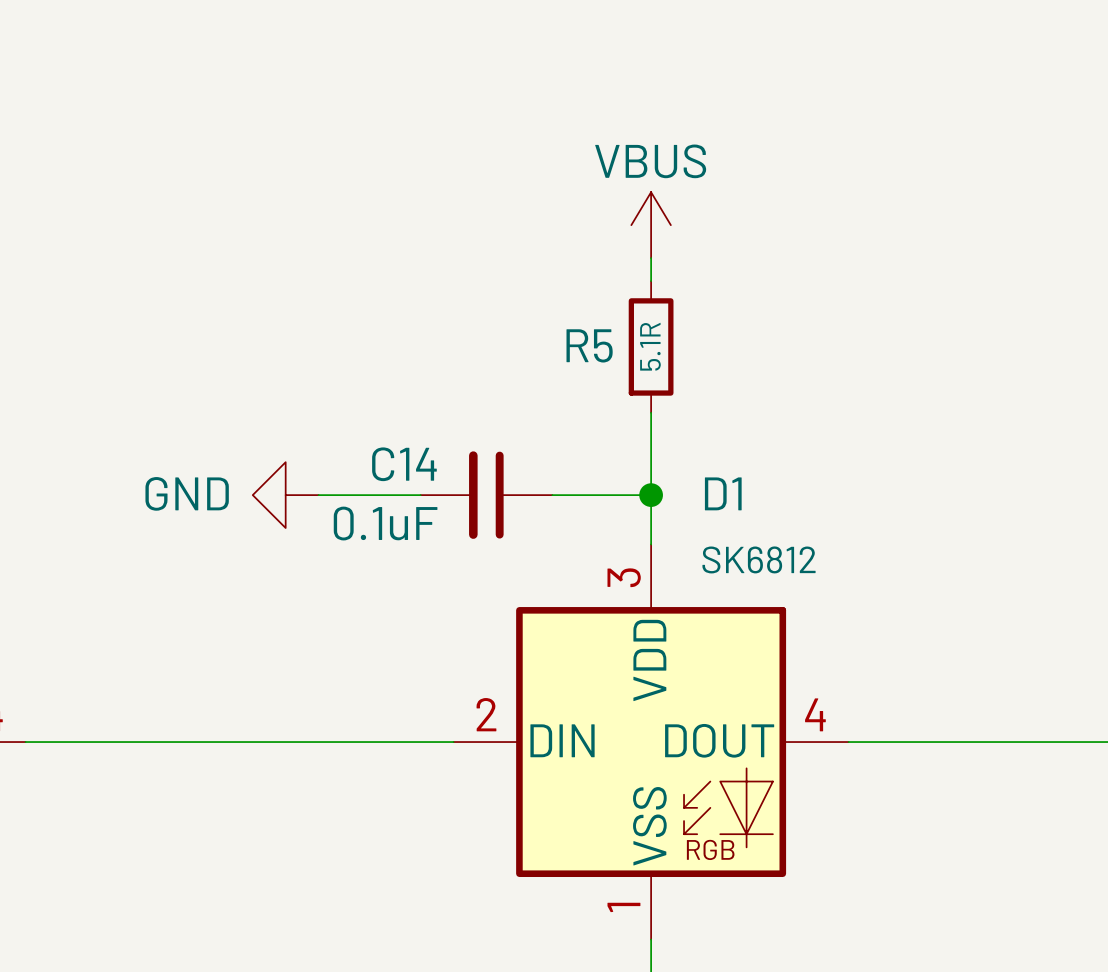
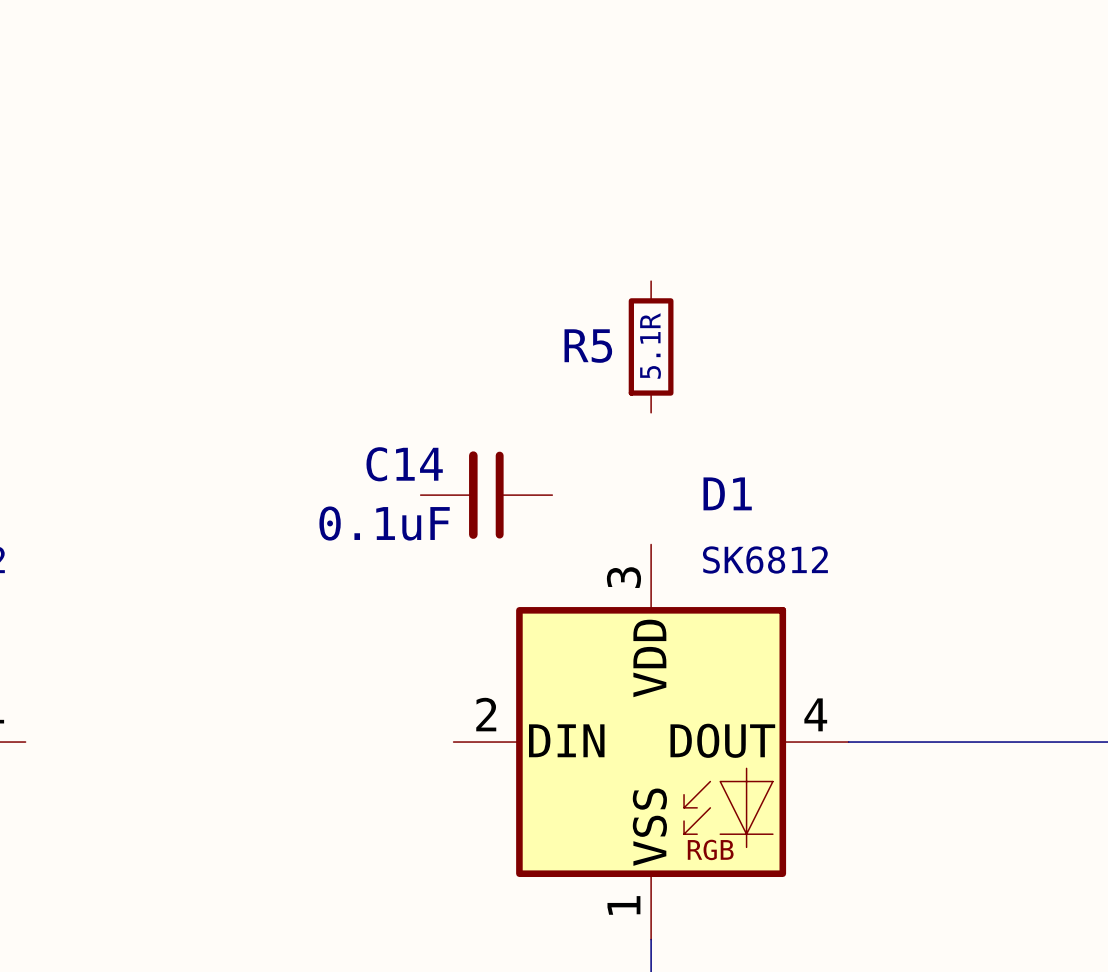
power symbol: VBUS (651, 225) -> none
wire: (651, 258) (651, 281) -> none
wire: (651, 412) (651, 544) -> none
power symbol: GND (285, 495) -> none
wire: (318, 495) (420, 495) -> none
wire: (552, 495) (651, 495) -> none
junction: (651, 495) -> none
wire: (25, 742) (453, 742) -> none

